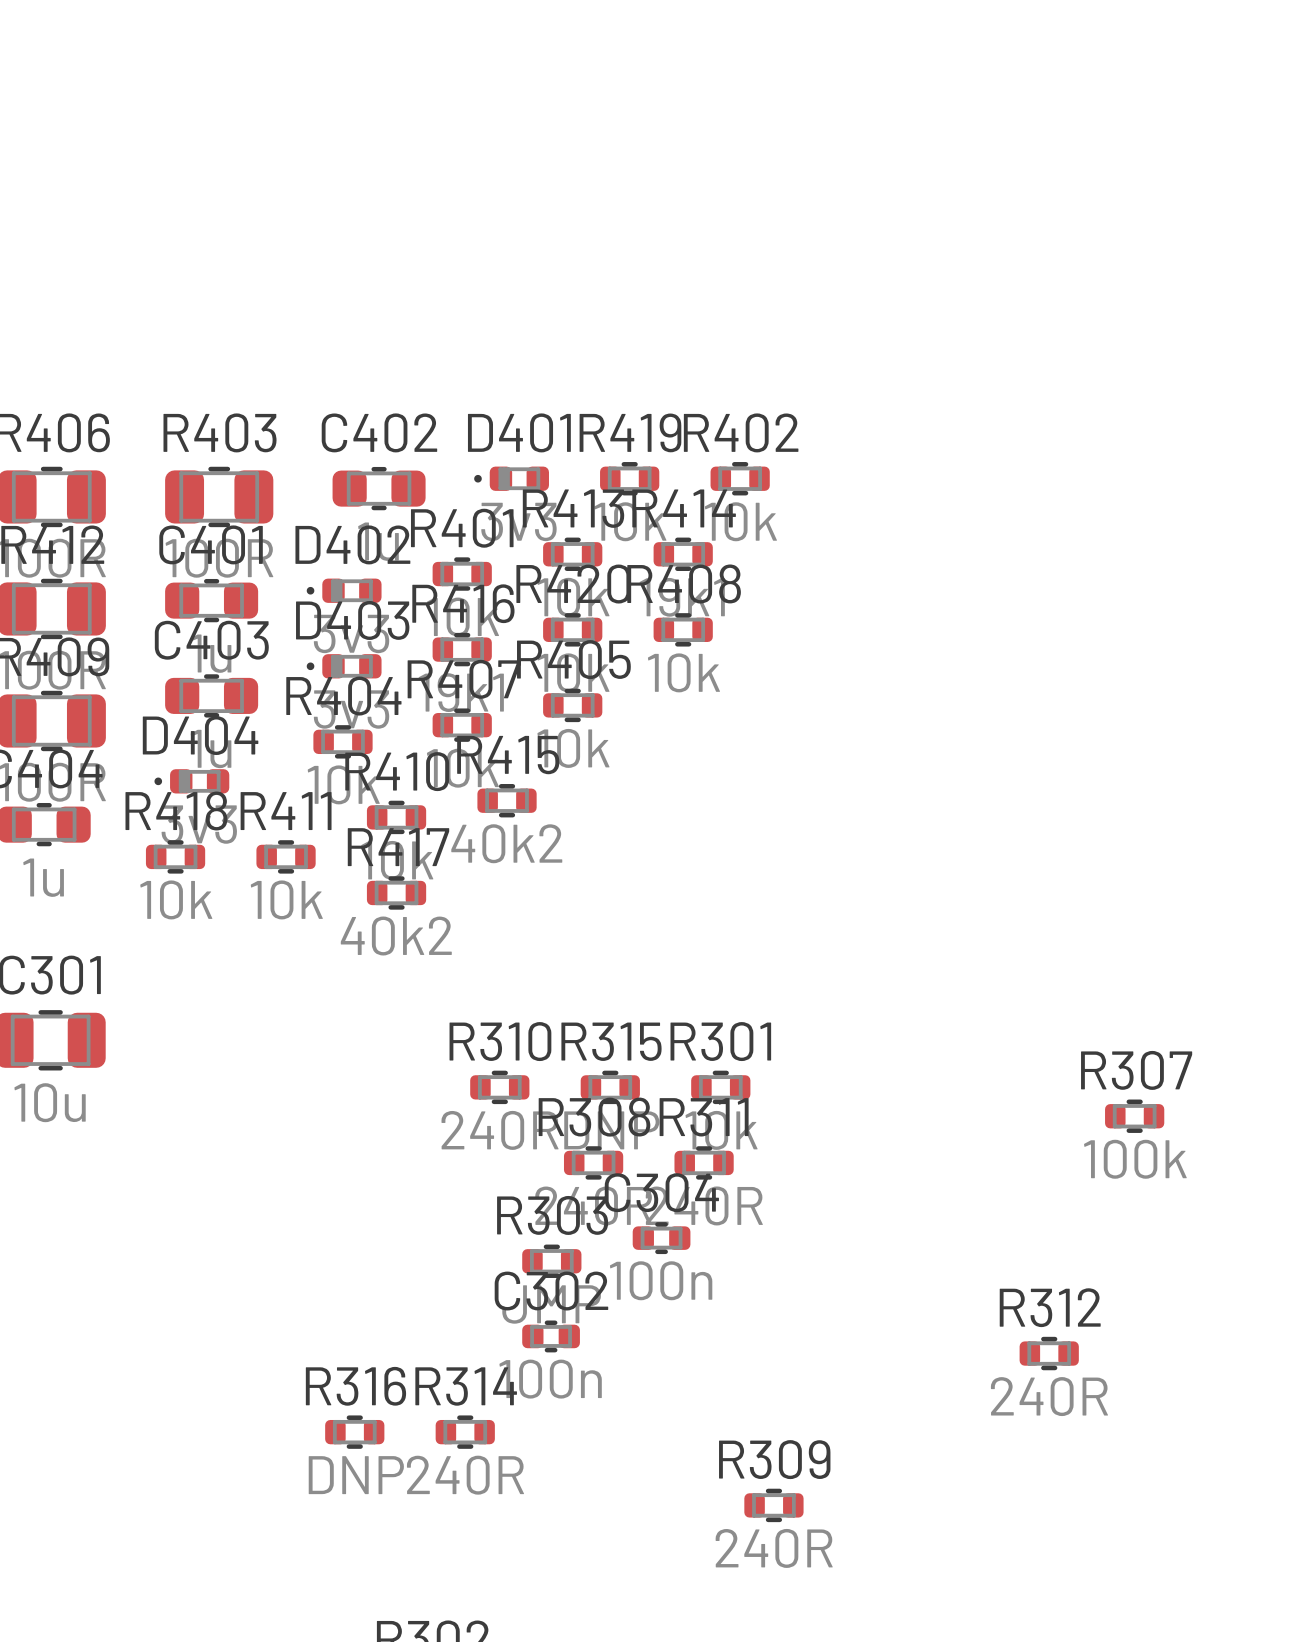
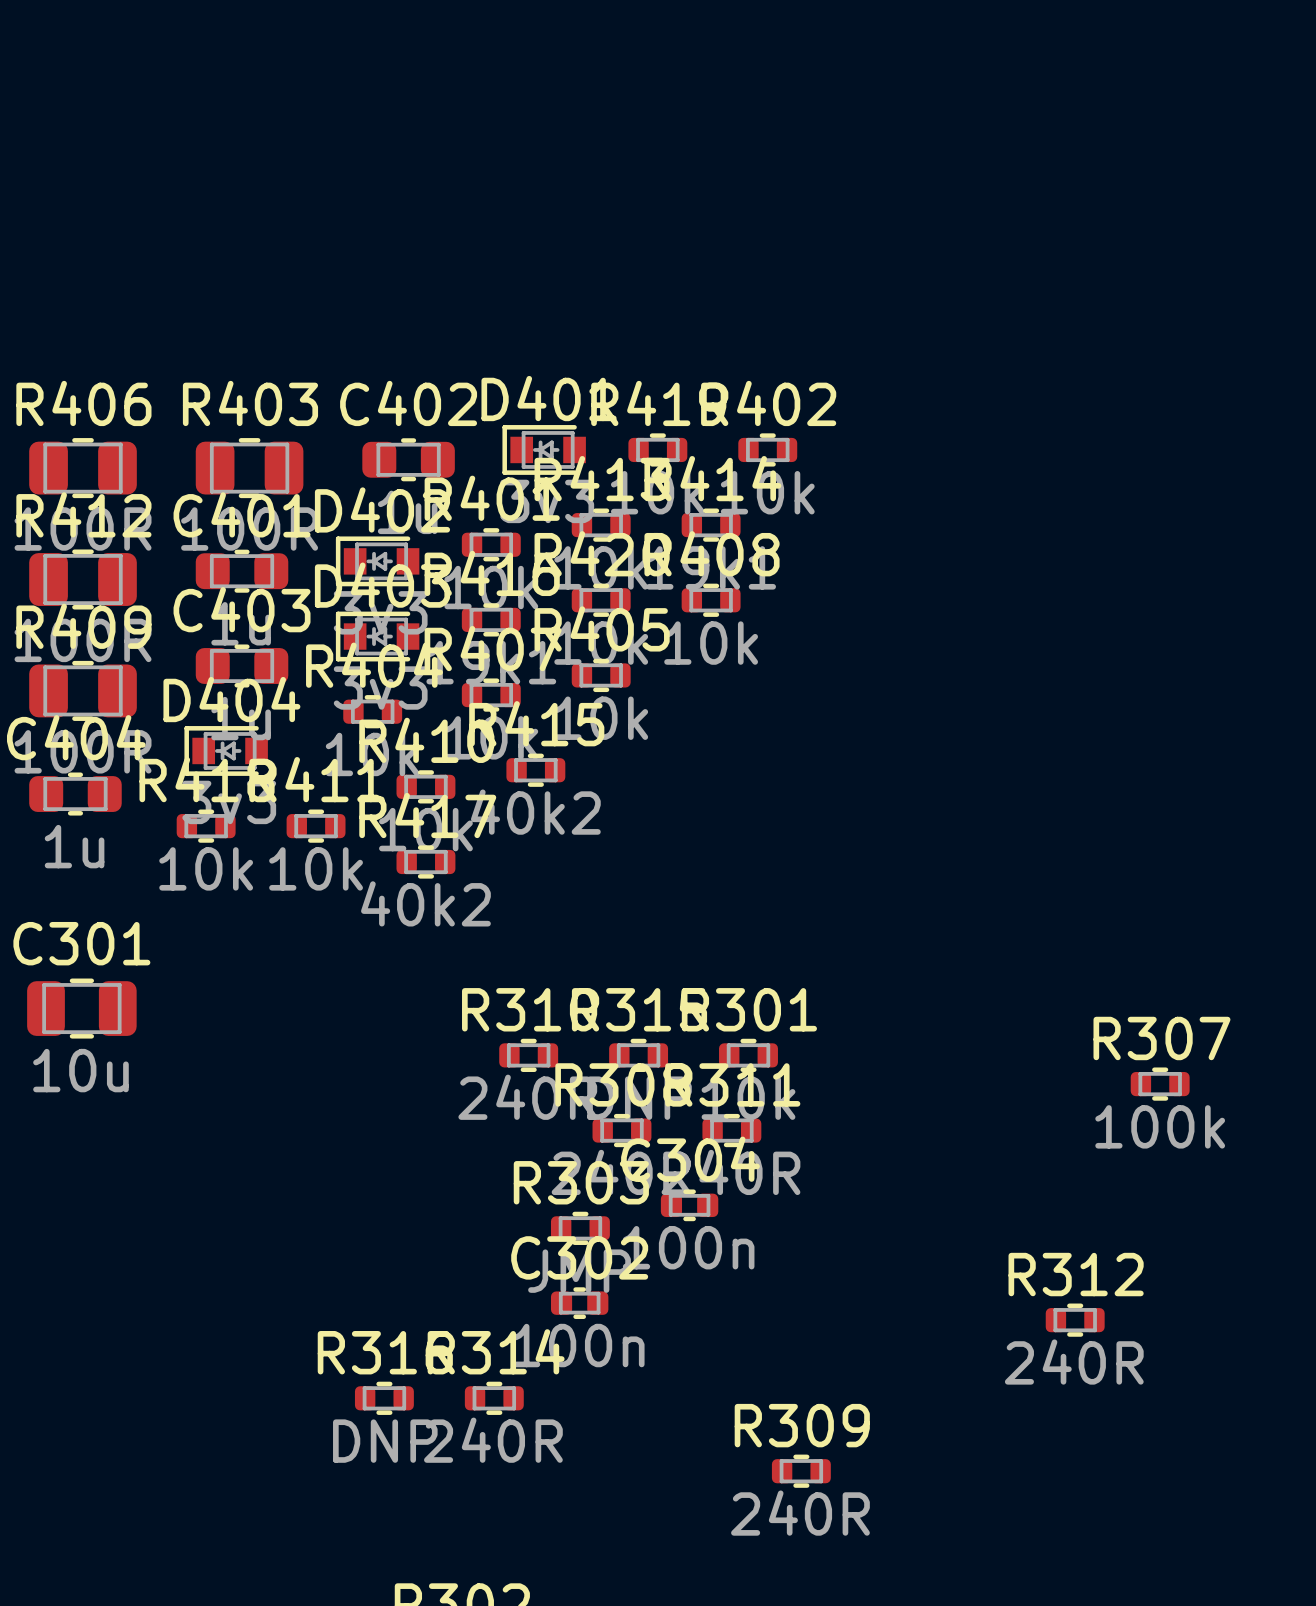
D401 footprint: [474, 466, 549, 491] -> [502, 425, 586, 475]
D402 footprint: [306, 578, 382, 603] -> [335, 536, 420, 587]
D403 footprint: [306, 654, 382, 679] -> [335, 611, 420, 662]
D404 footprint: [154, 769, 230, 794] -> [184, 726, 268, 776]

